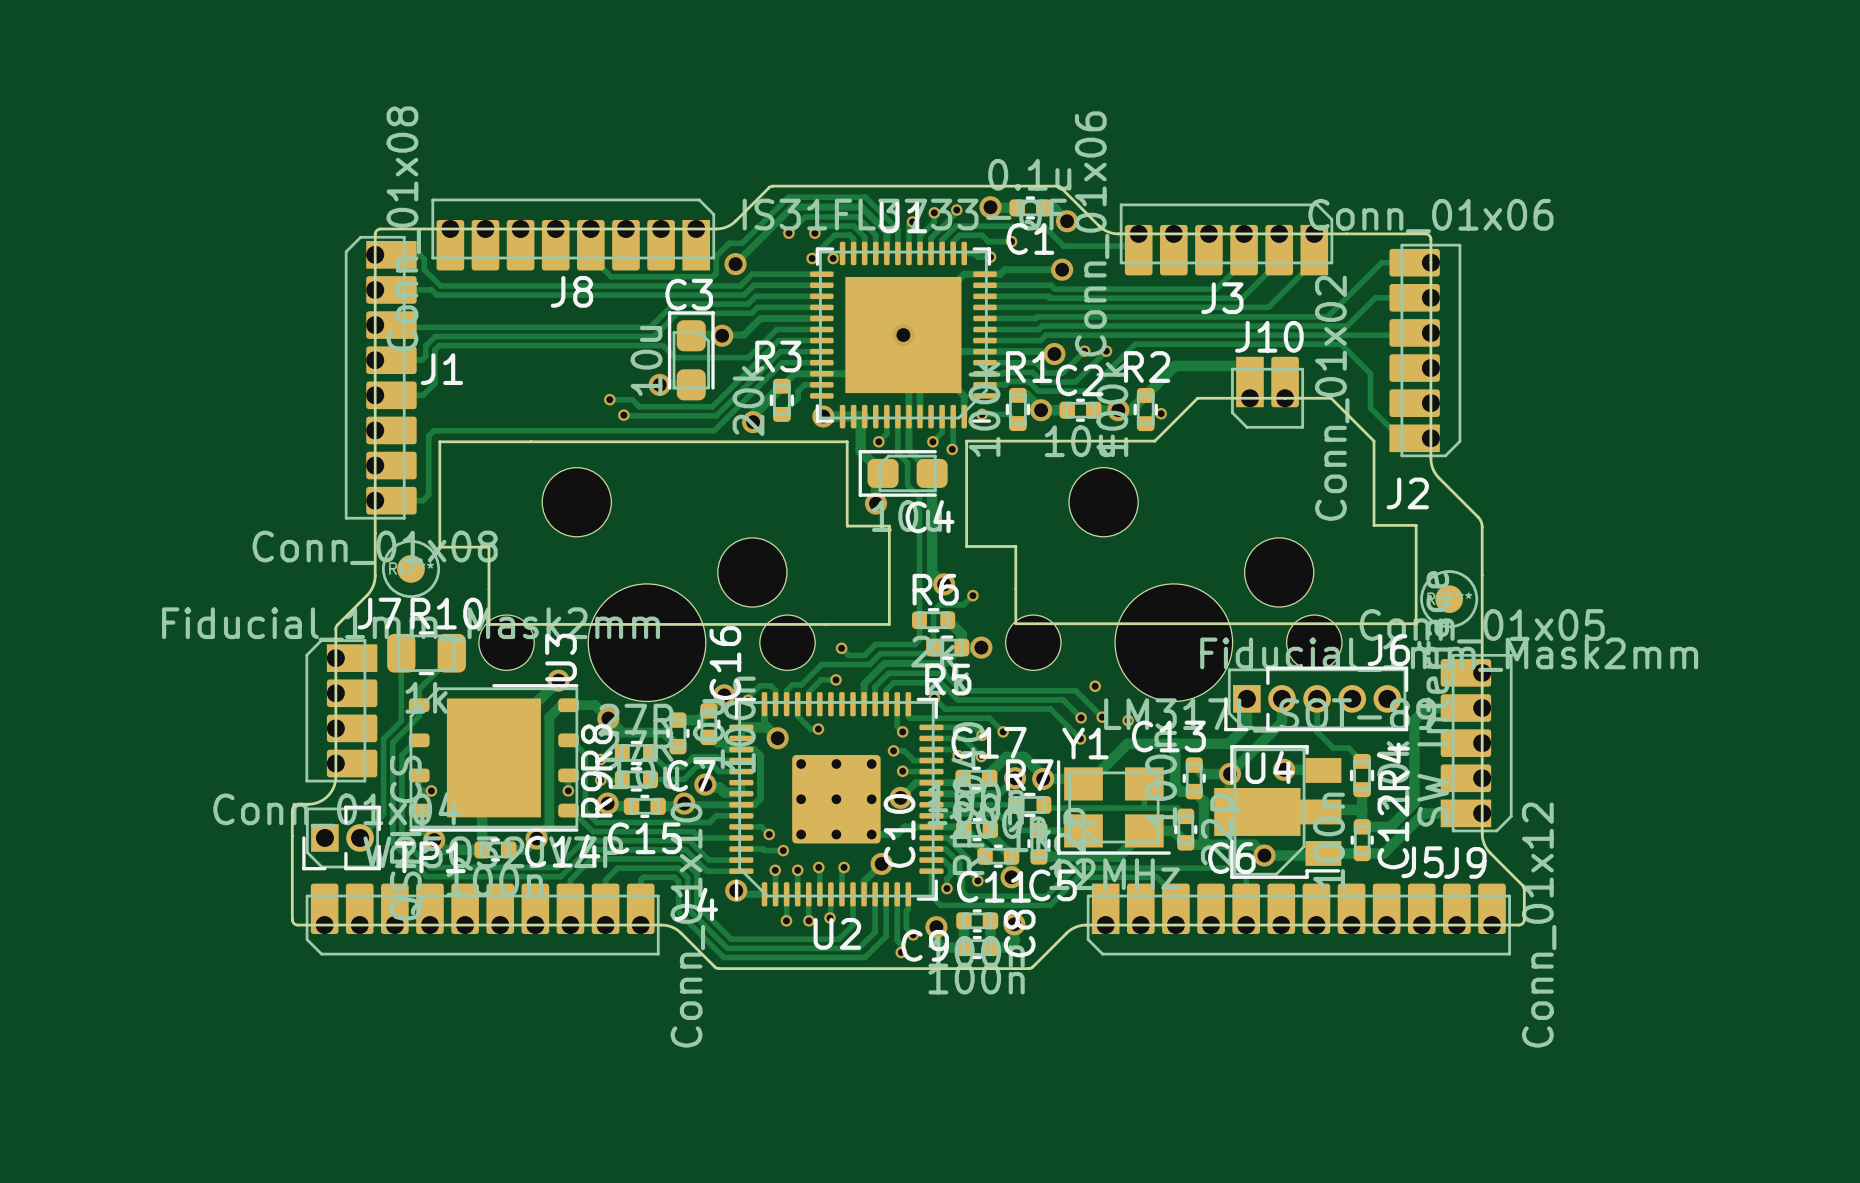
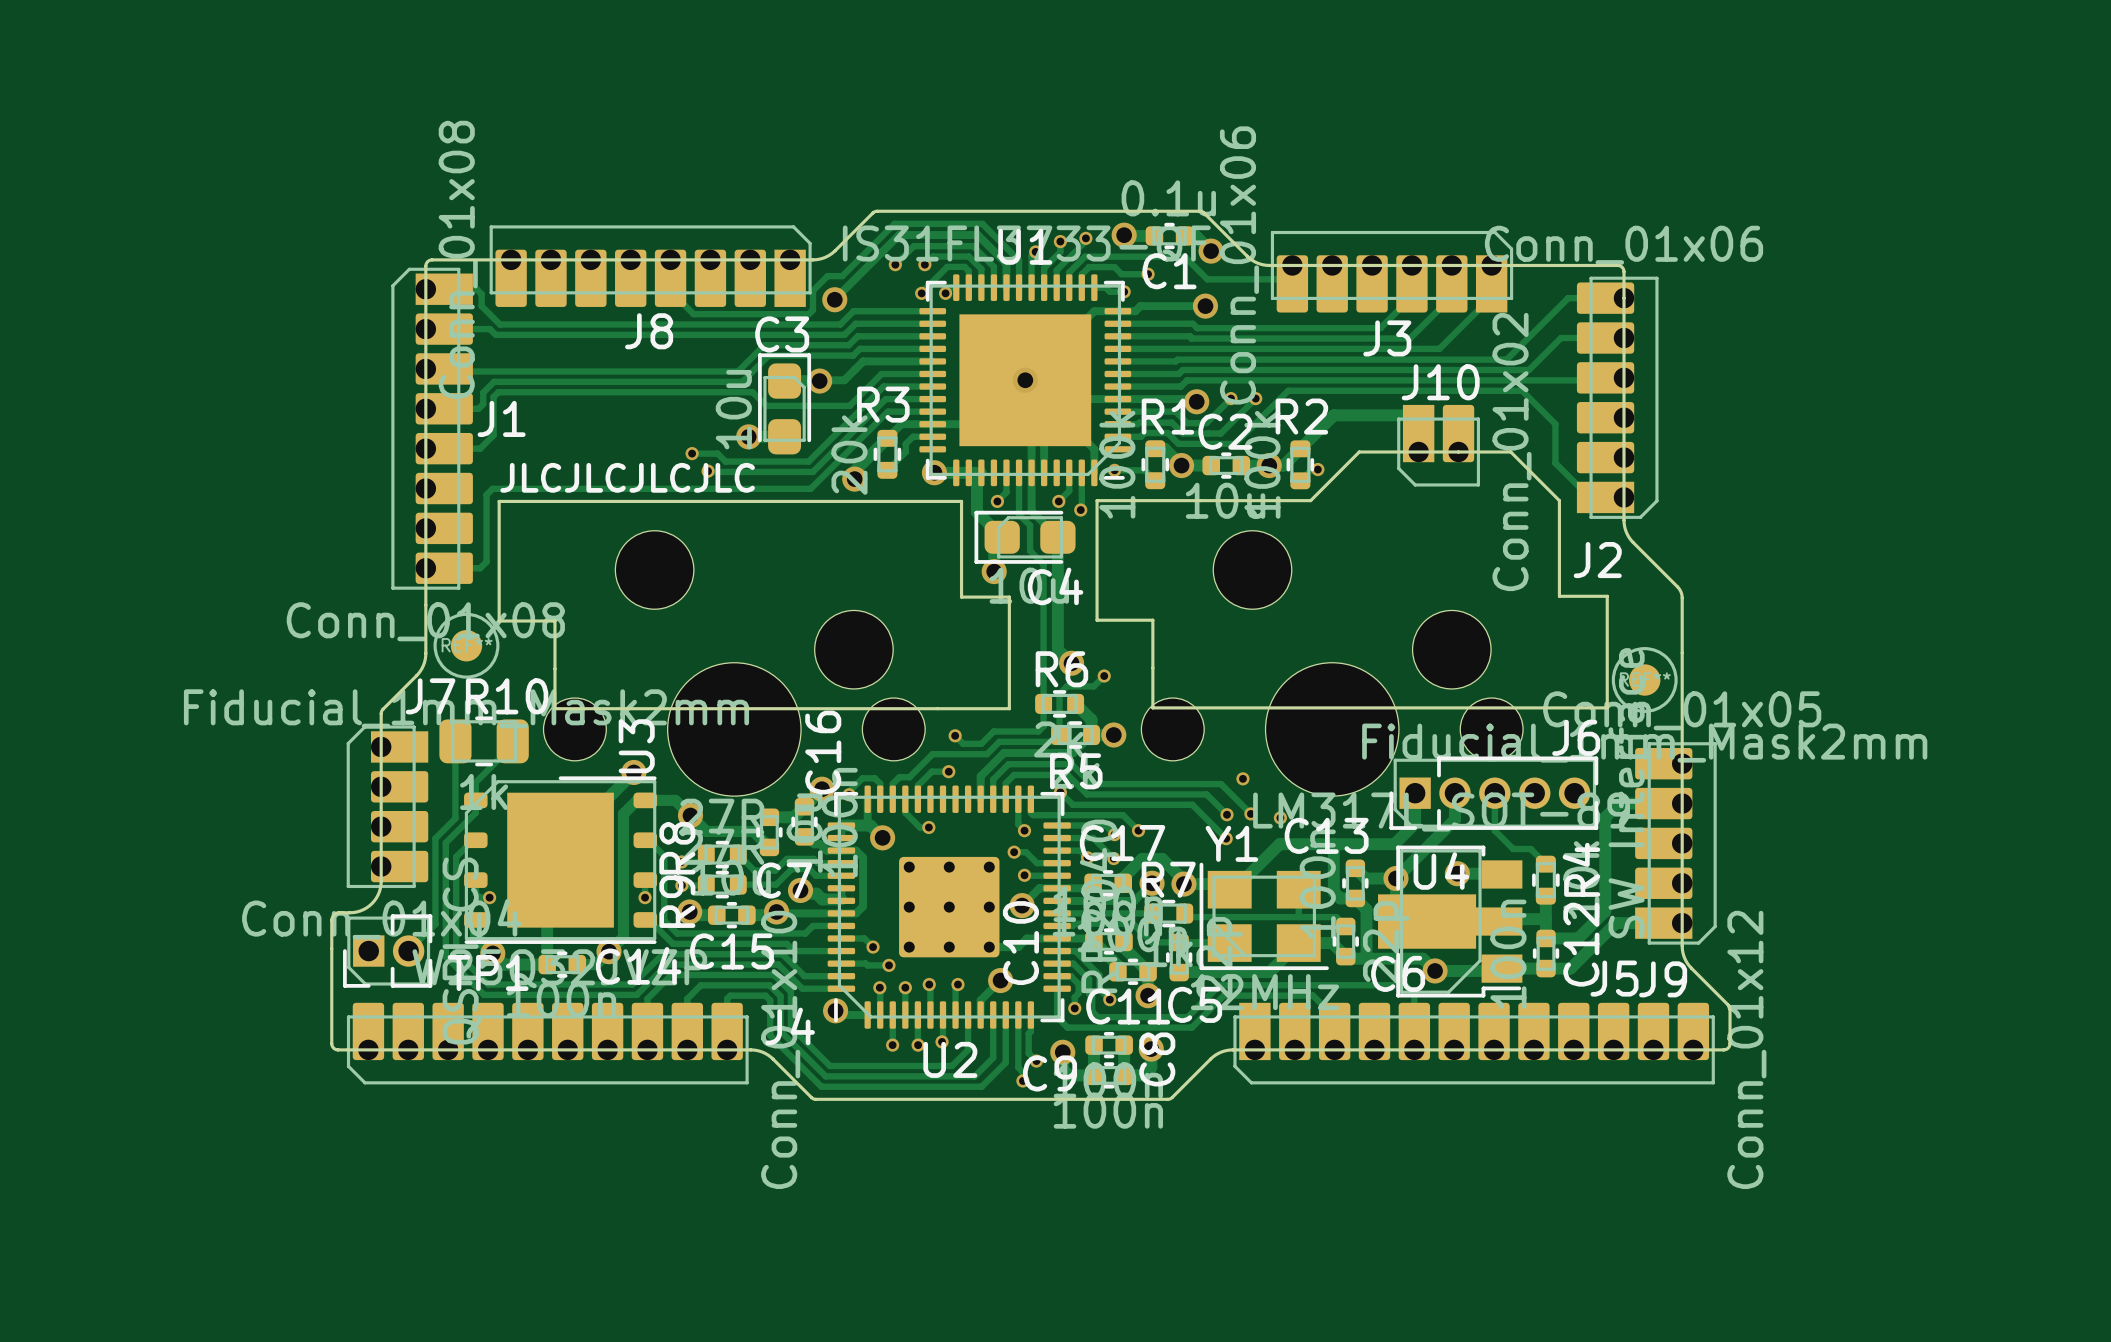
text: none -> JLCJLCJLCJLC (627, 477)

